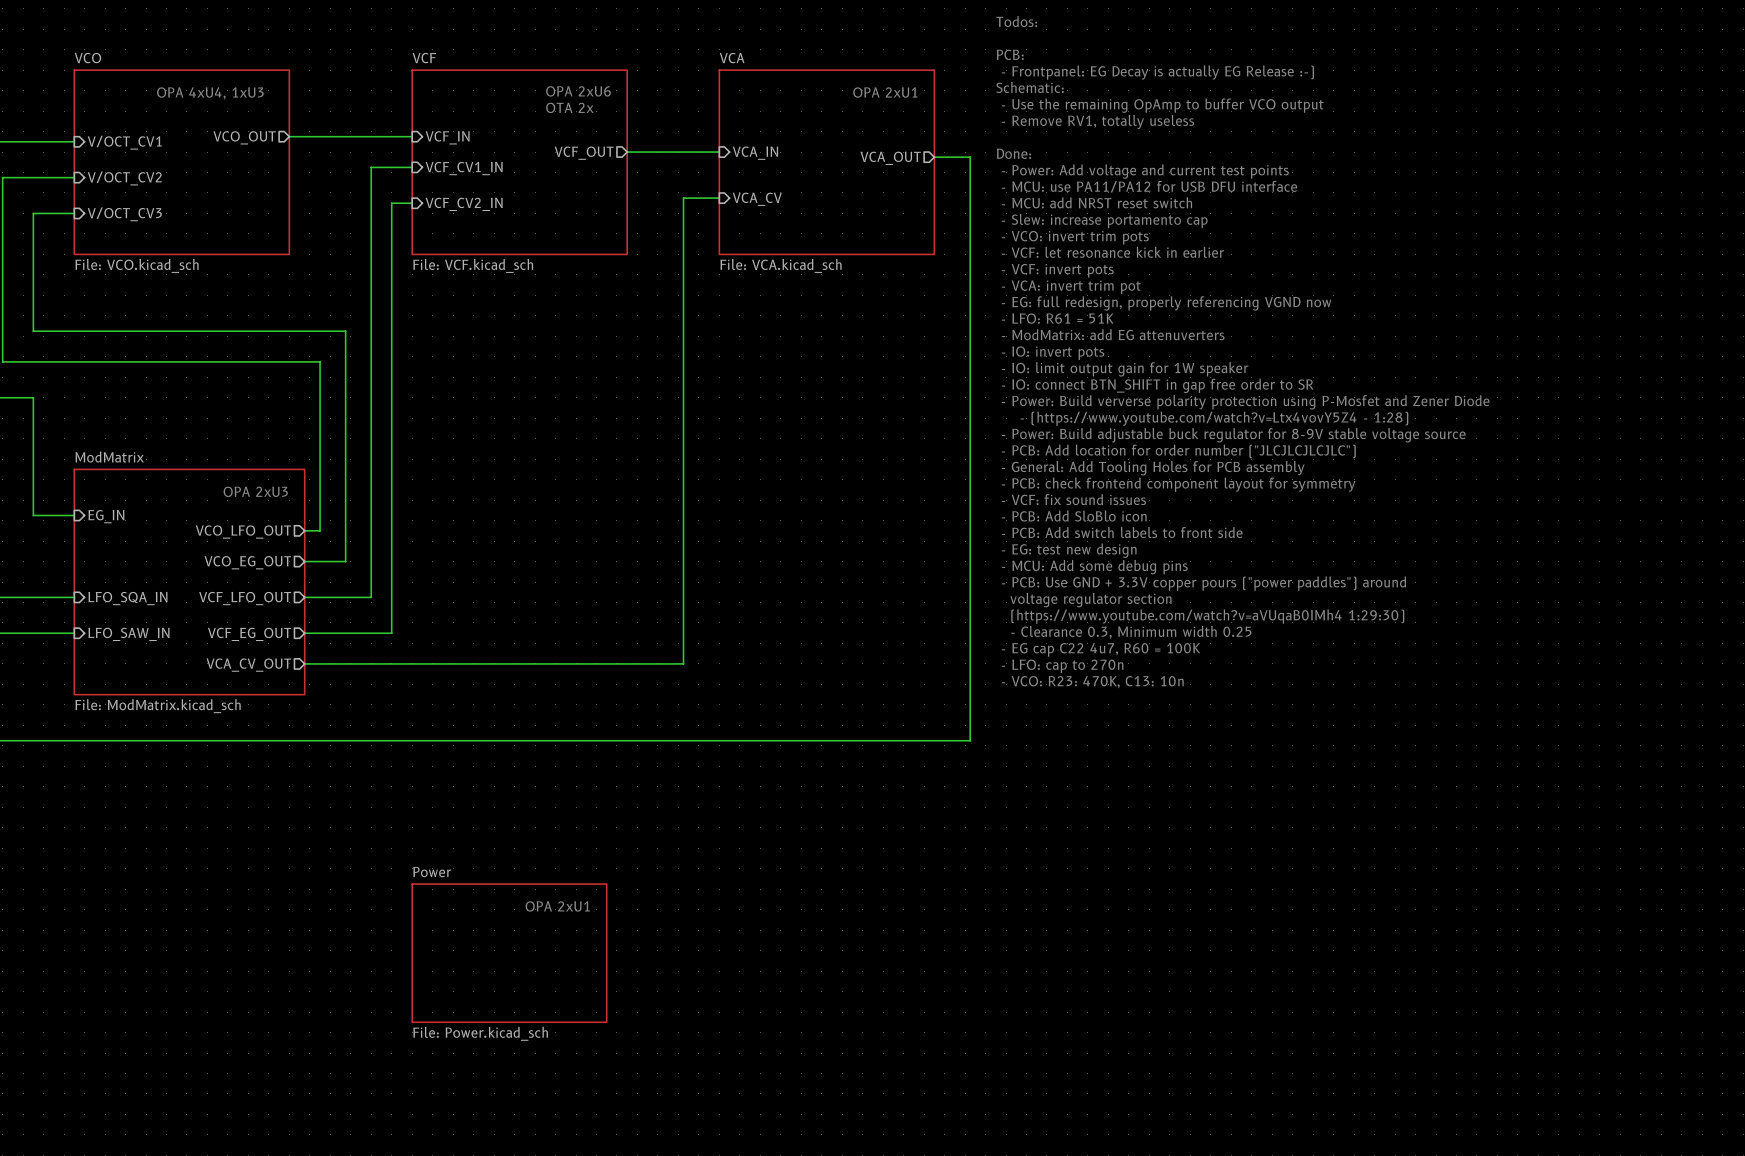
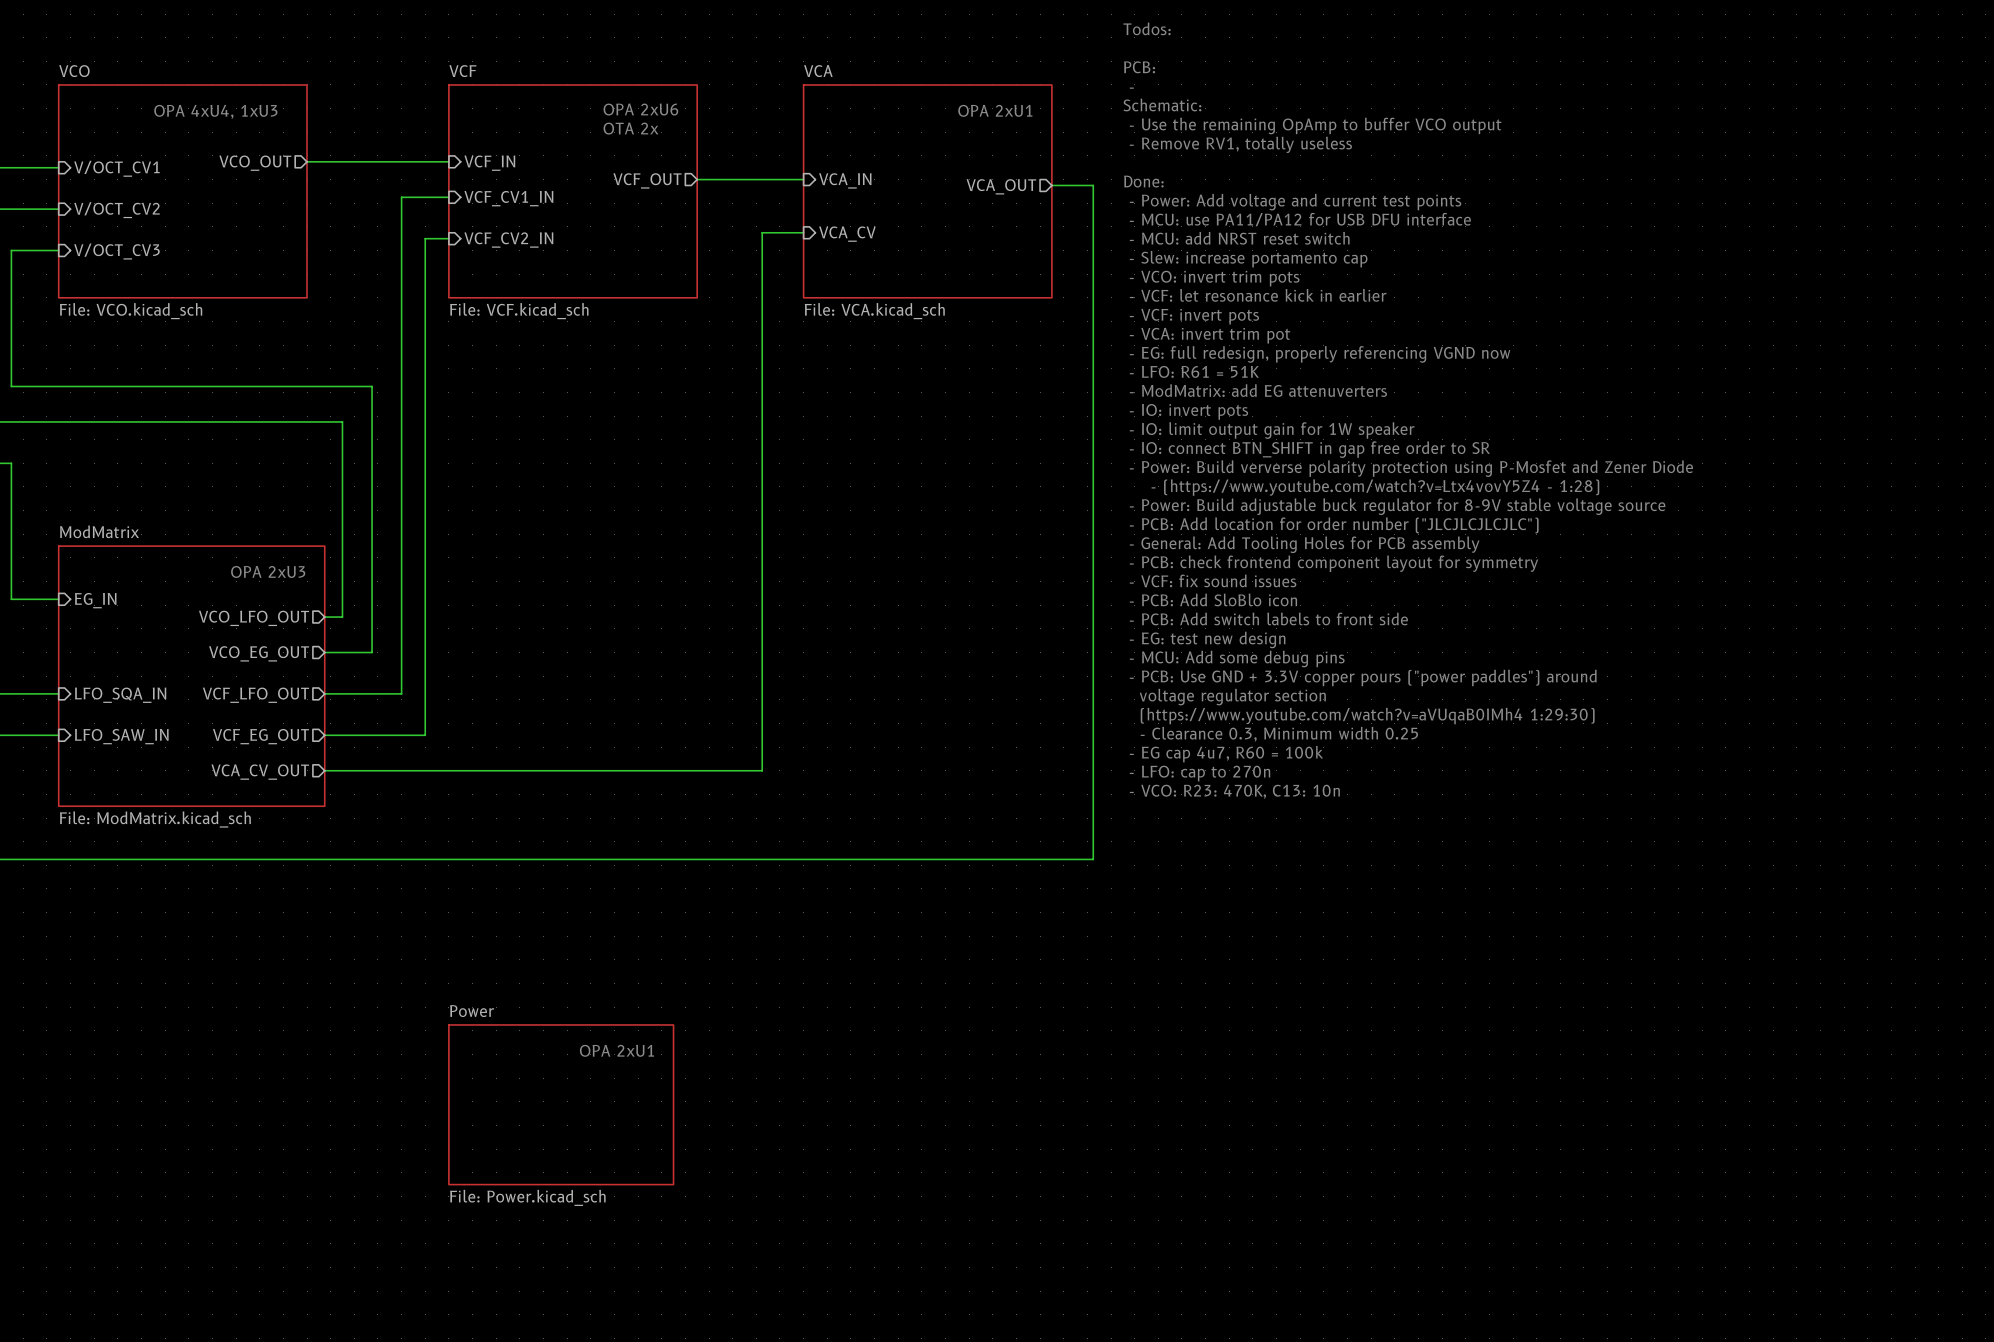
text: - Frontpanel: EG Decay is actually EG Release :-) (1157, 72) -> - (1131, 88)
text: - EG cap C22 4u7, R60 = 100K (1100, 649) -> - EG cap 4u7, R60 = 100k (1226, 754)

